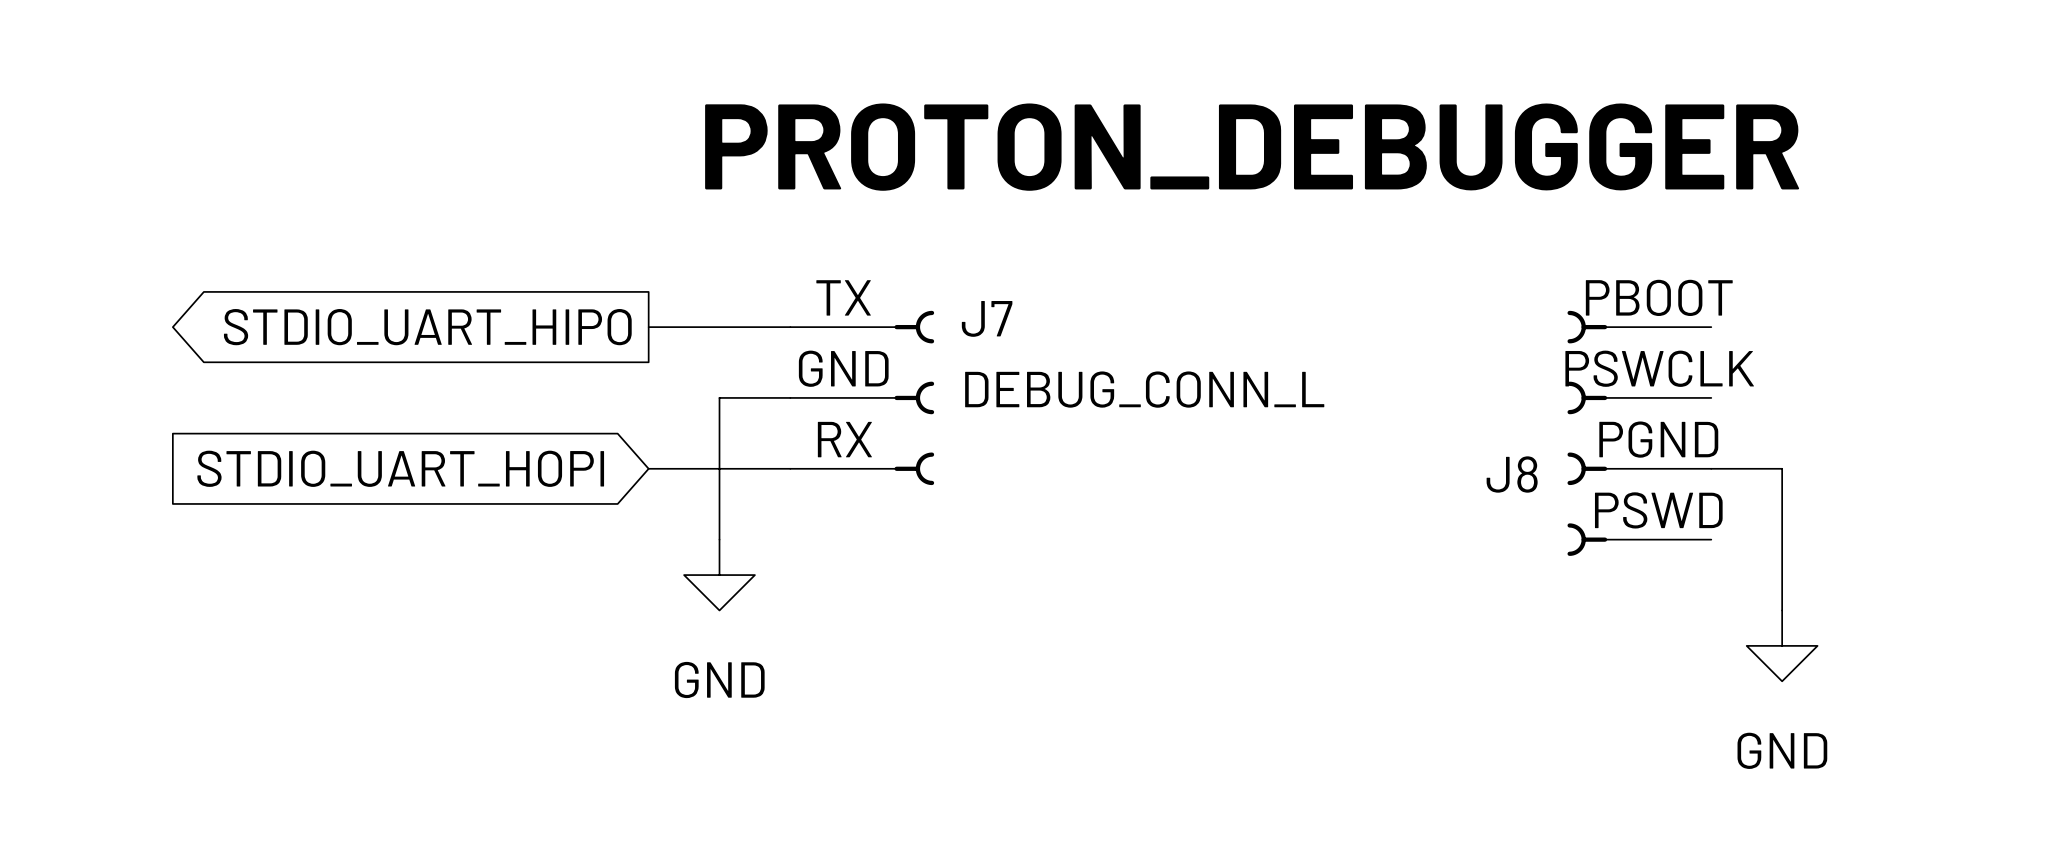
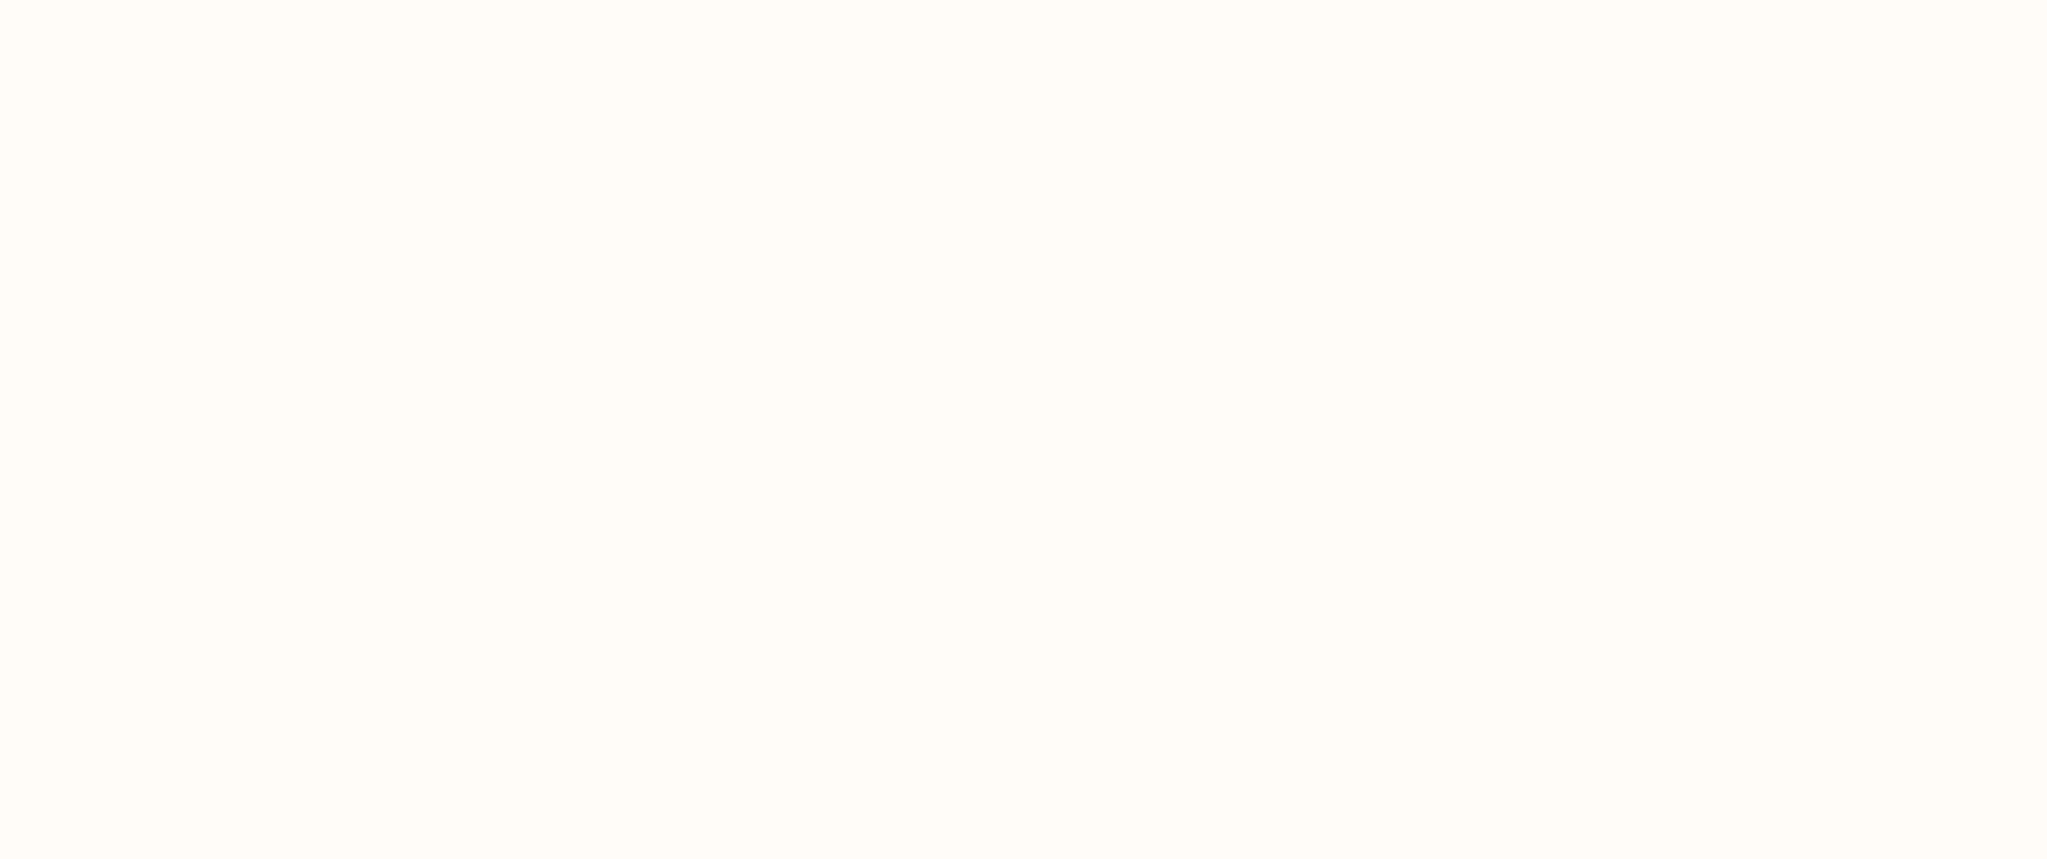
text: PROTON_DEBUGGER (1252, 147) -> none
global label: STDIO_UART_HIPO (427, 327) -> none
wire: (648, 327) (790, 327) -> none
wire: (790, 397) (719, 397) (719, 539) -> none
J7: DEBUG_CONN_L (862, 397) -> none
J8: (1639, 433) -> none
global label: STDIO_UART_HOPI (400, 468) -> none
wire: (648, 468) (790, 468) -> none
wire: (1711, 468) (1782, 468) (1782, 610) -> none
power symbol: GND (719, 575) -> none
power symbol: GND (1782, 645) -> none

